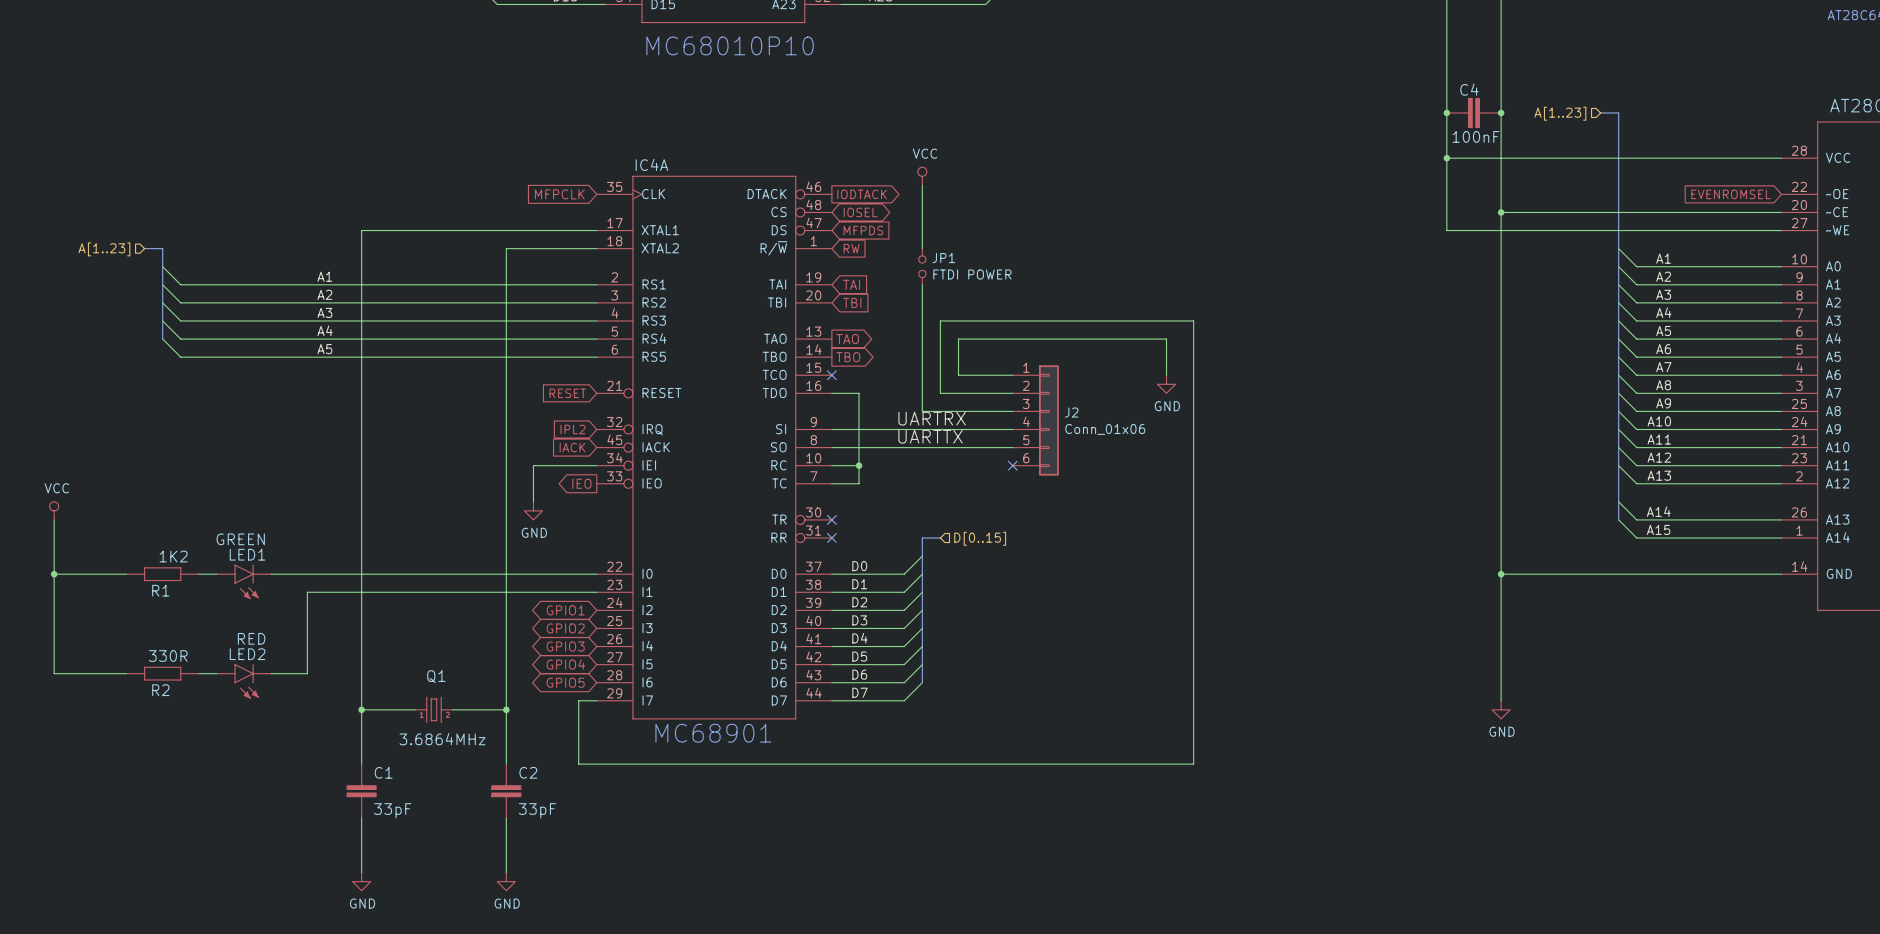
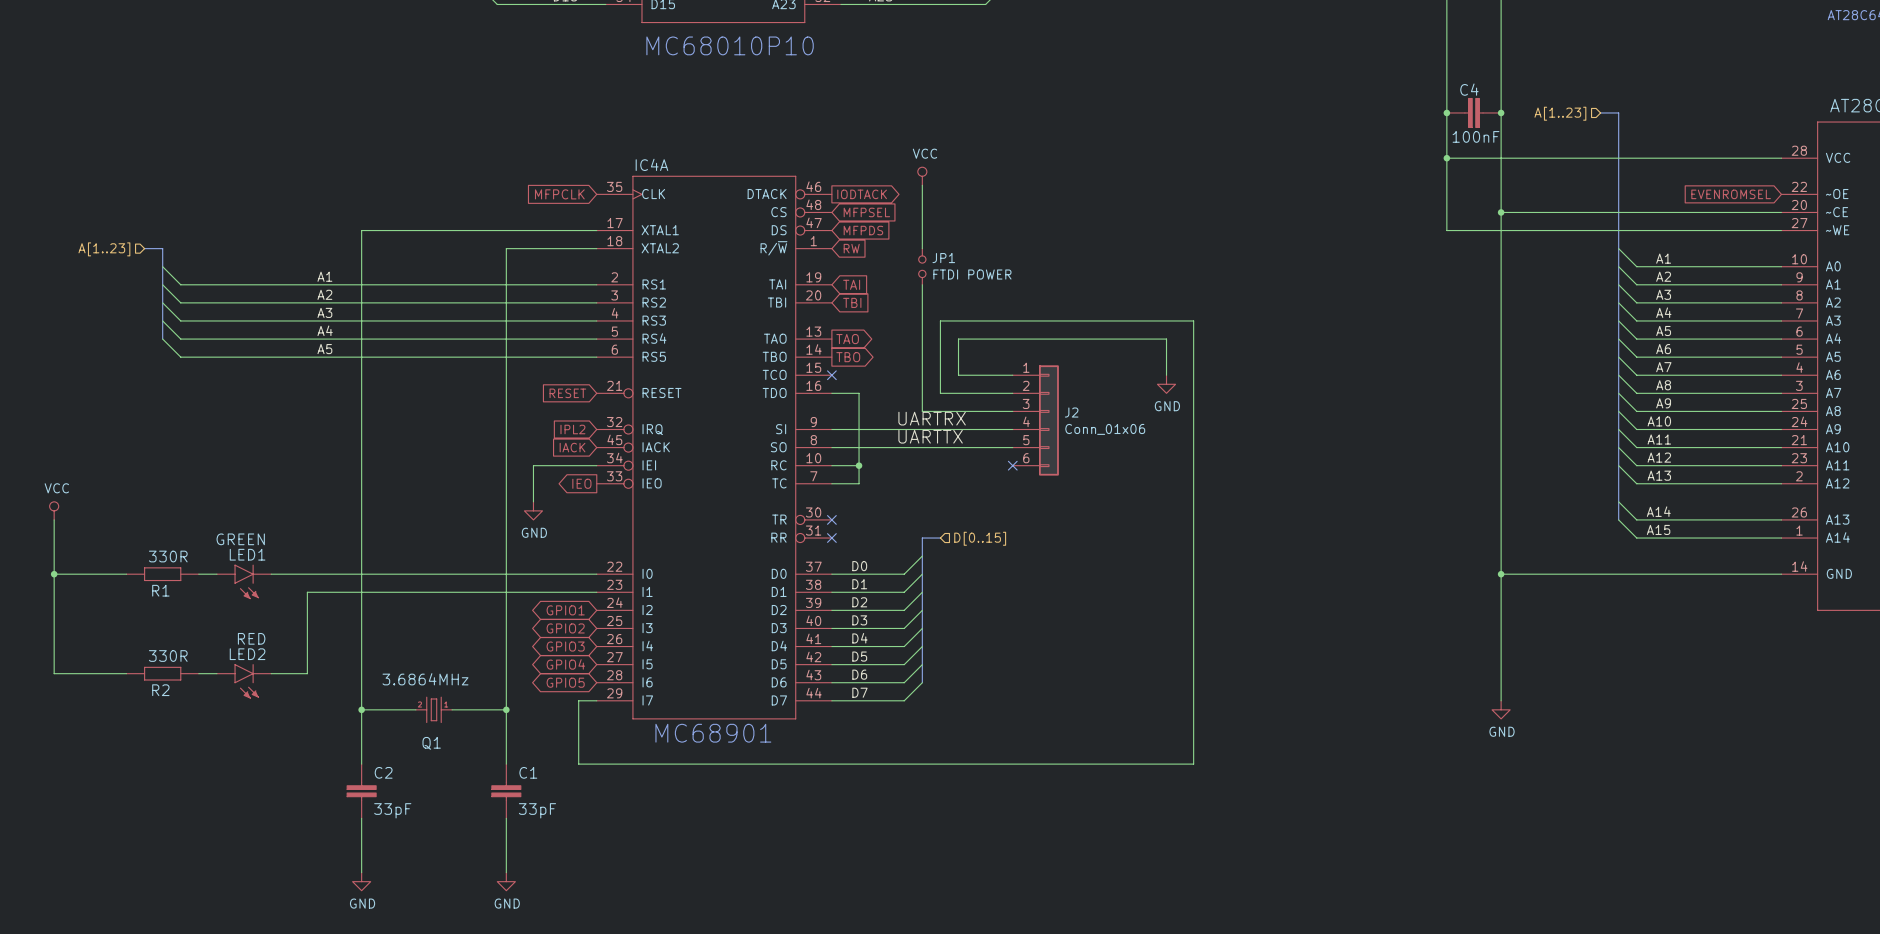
global label shape: bidirectional (860, 212) -> input (866, 212)
global label: IOSEL (860, 212) -> MFPSEL (866, 212)
R1 value: 1K2 (173, 556) -> 330R (168, 556)
Q1 rotation: 0° (433, 709) -> 180° (433, 709)
C1 name: C1 (383, 772) -> C2 (383, 772)
C2 name: C2 (528, 772) -> C1 (528, 772)

